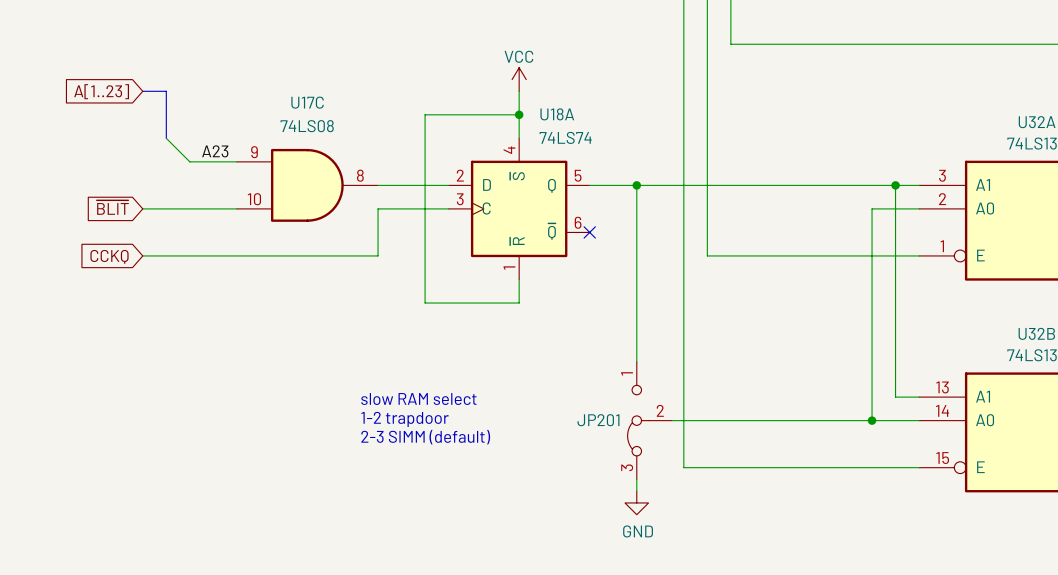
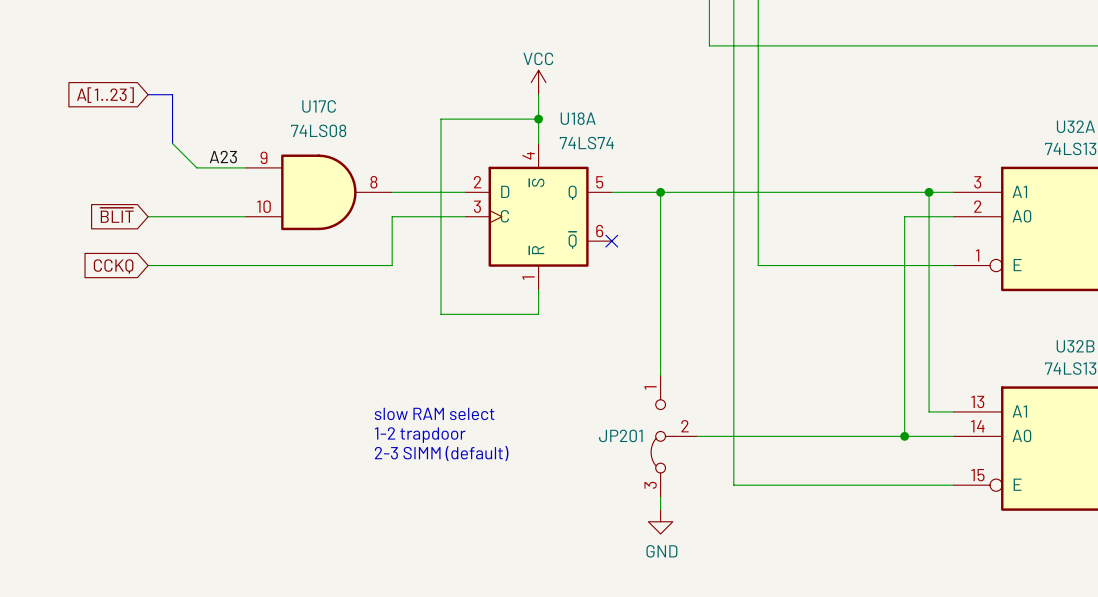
wire: (683, 44) (683, 467) (707, 467) -> (709, 45) (758, 45) (758, 265)
wire: (707, 255) (730, 255) -> (733, 265) (733, 485)

